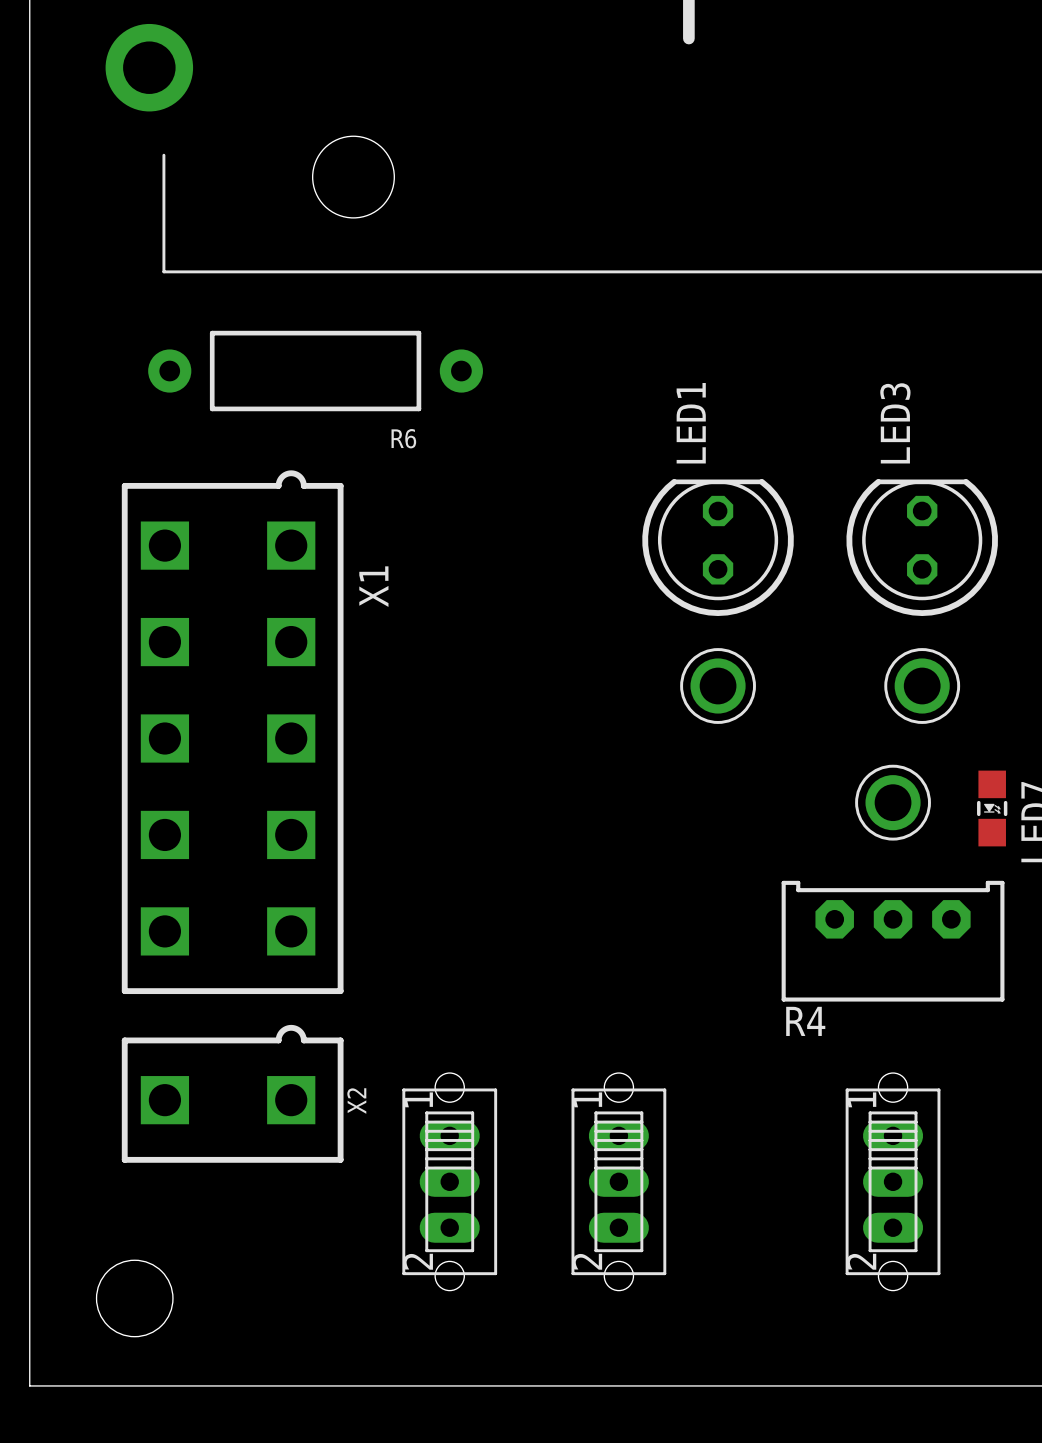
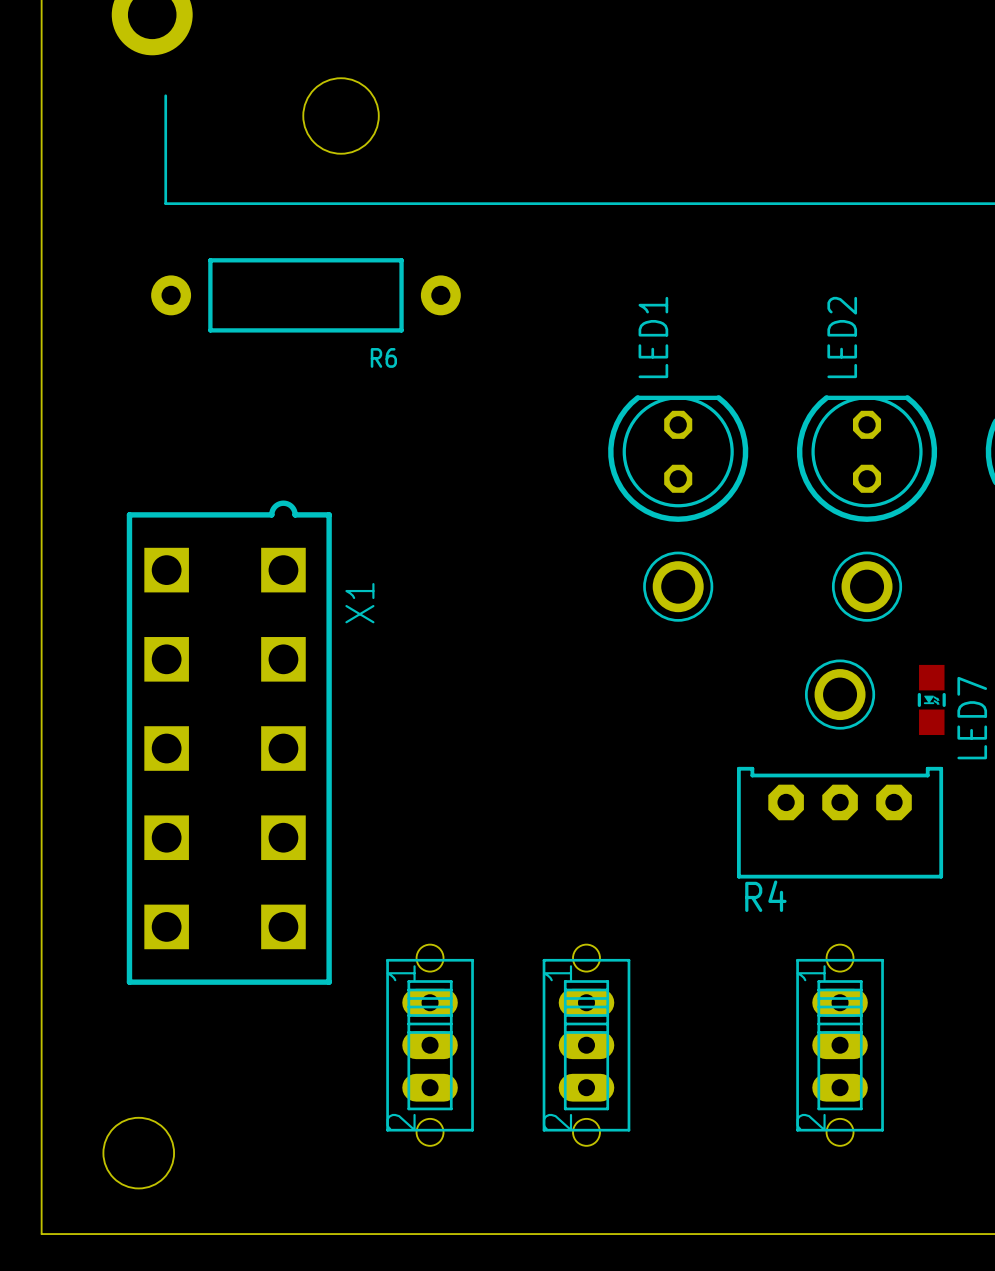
LED3 name: LED3 (895, 423) -> LED2 (842, 337)
X1 position: (232, 732) -> (229, 742)
X2: (232, 1093) -> none

